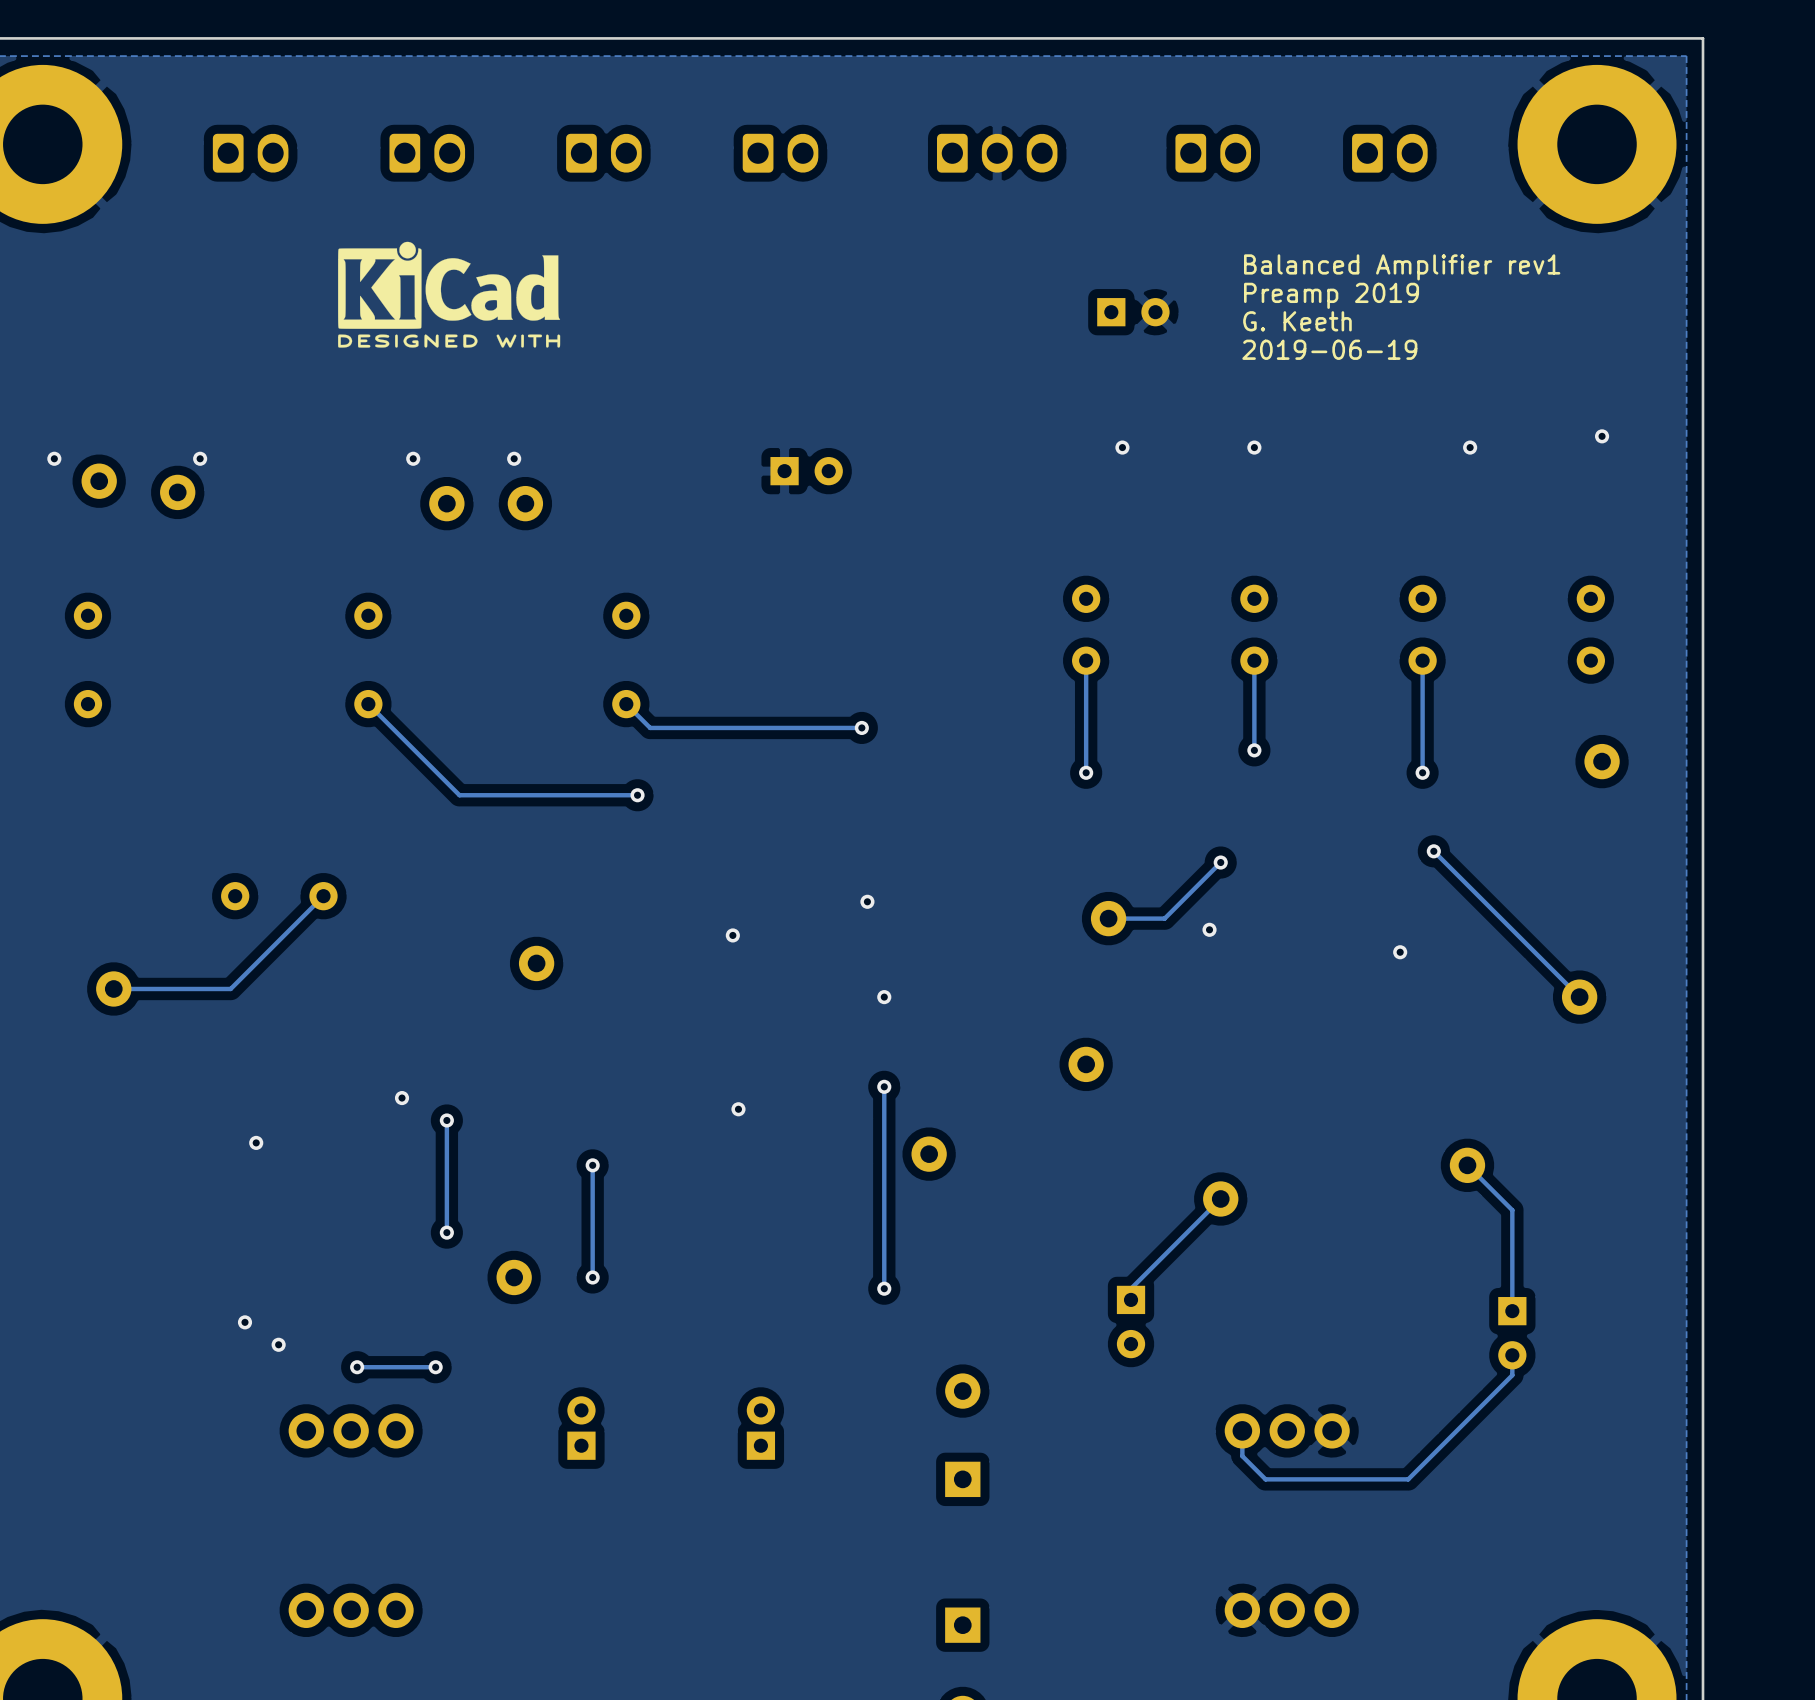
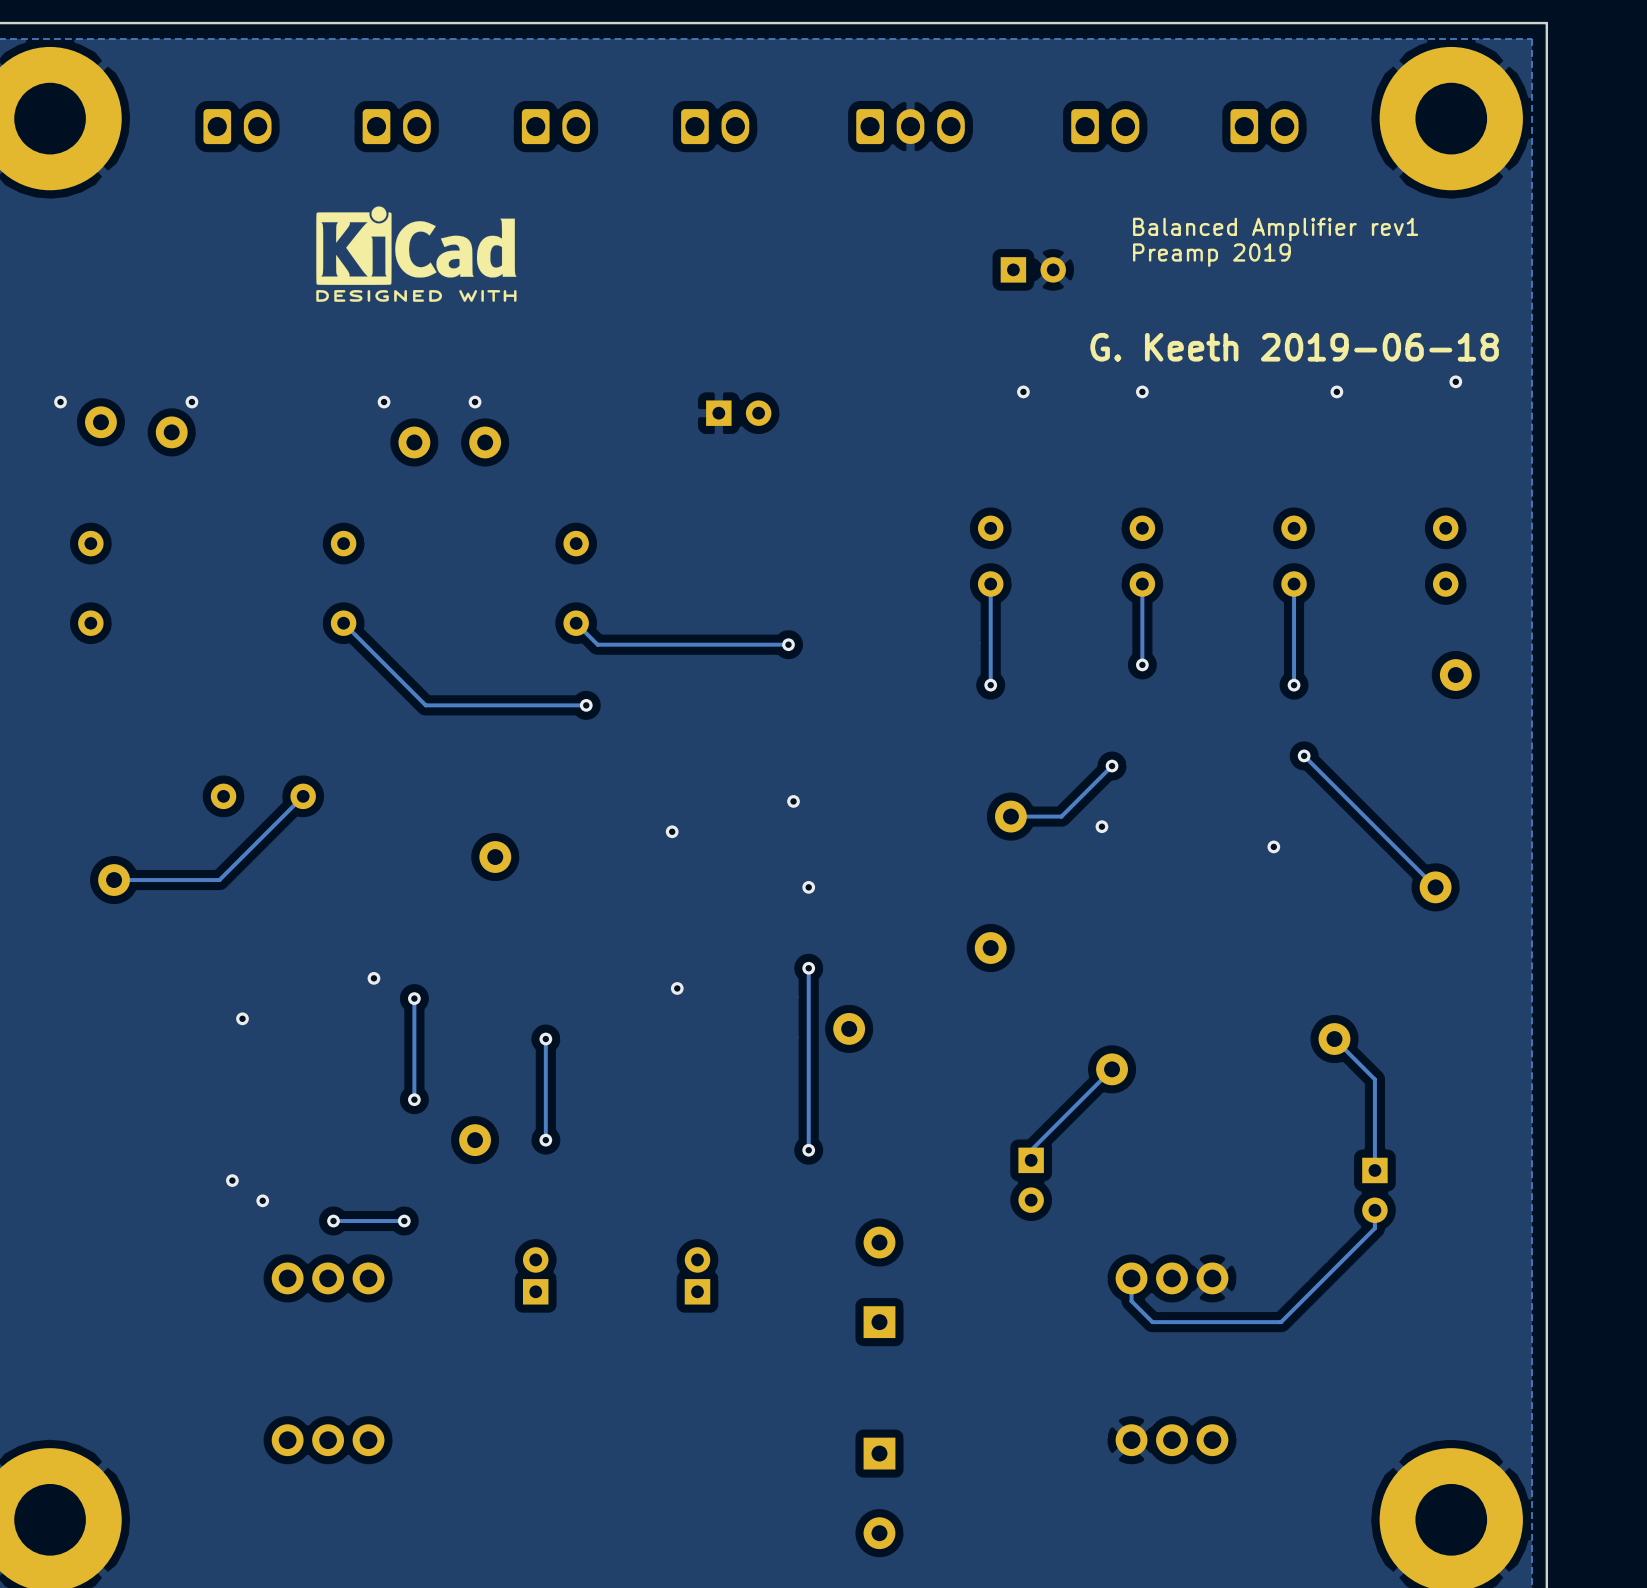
text: G. Keeth (1297, 321) -> none
text: 2019-06-19 (1329, 349) -> none
text: none -> G. Keeth 2019-06-18 (1294, 347)

